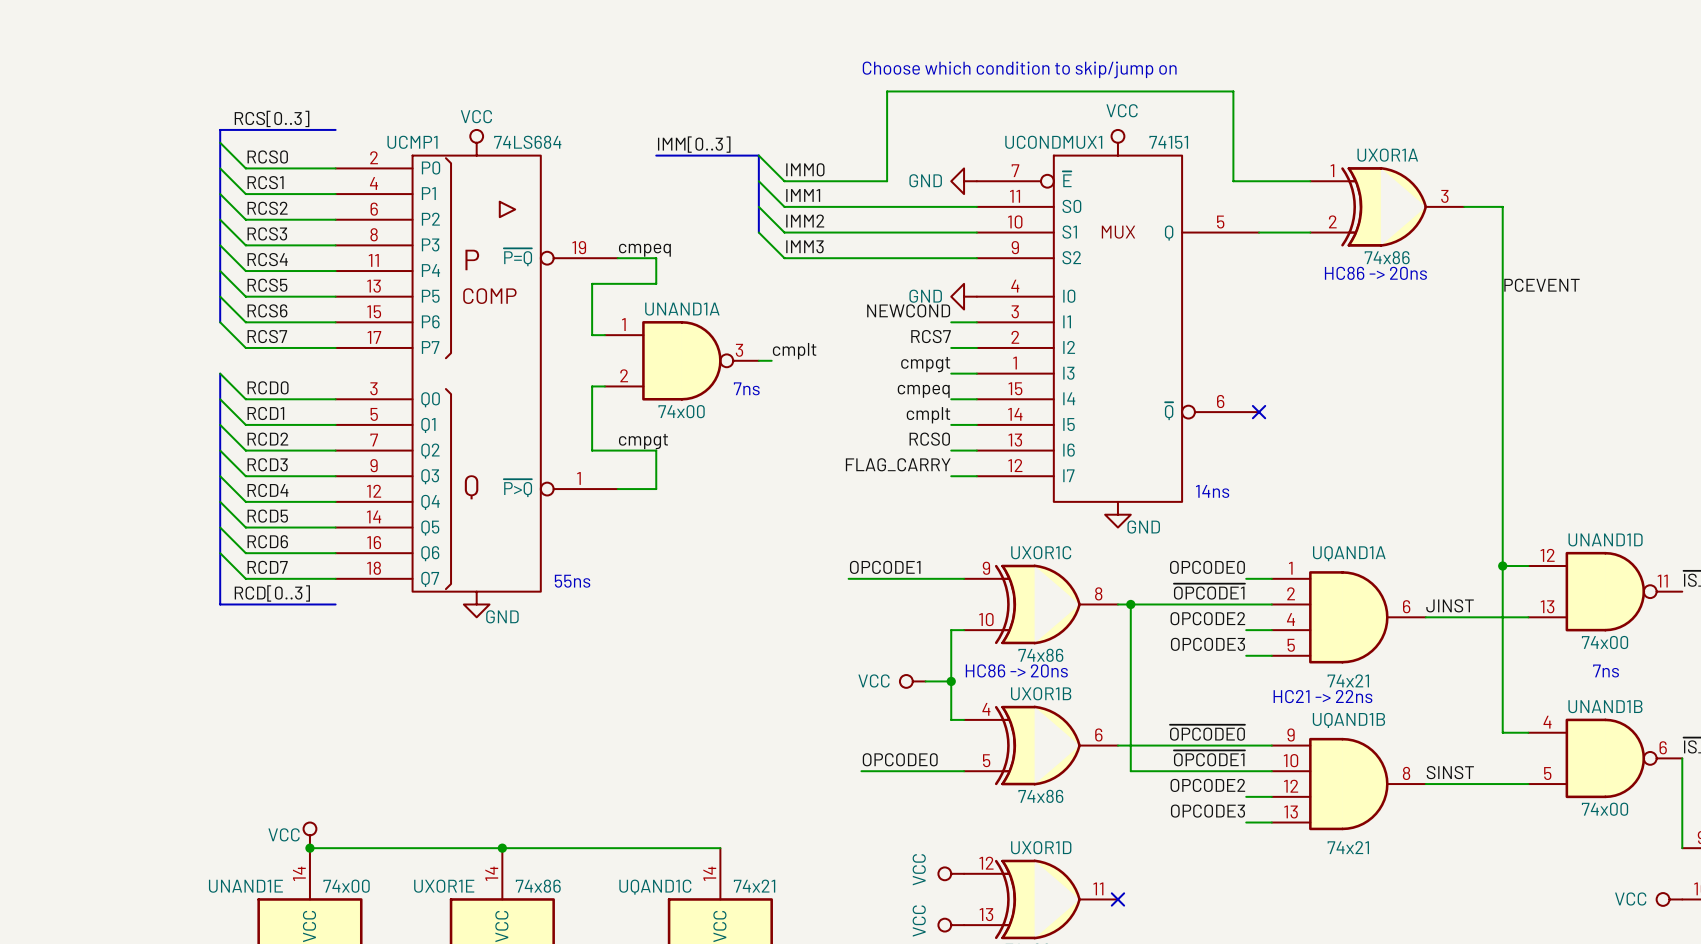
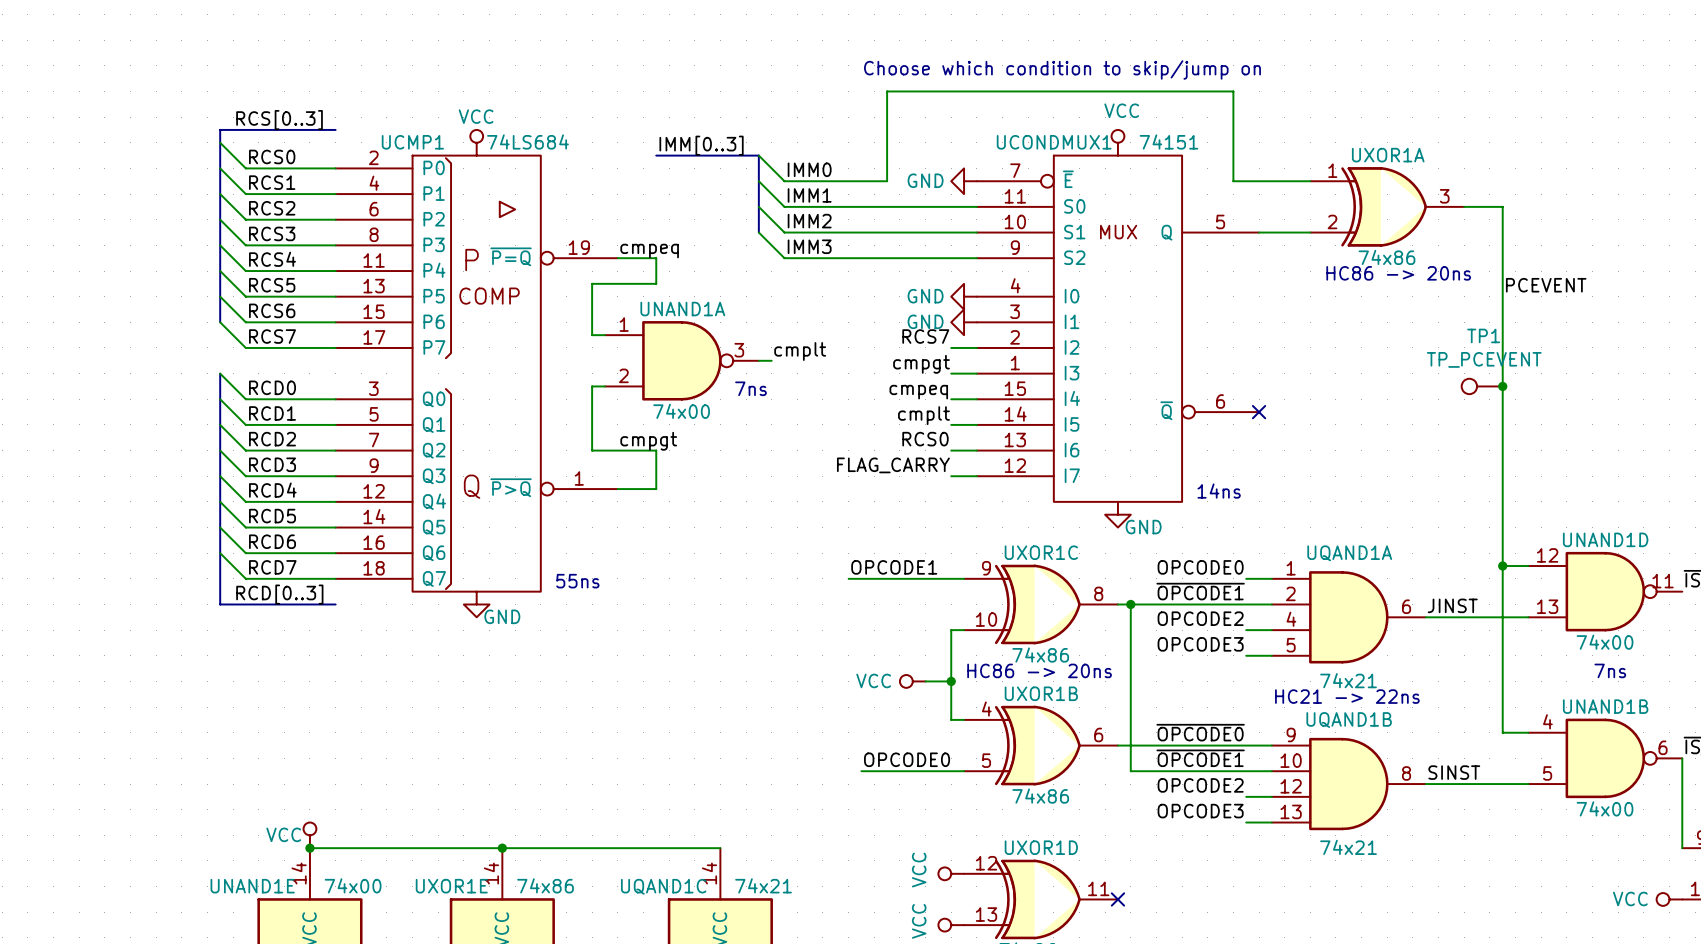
label: NEWCOND (908, 310) -> none
power symbol: none -> GND (964, 322)
TP1: none -> TP_PCEVENT (1482, 386)
junction: none -> (1502, 386)

